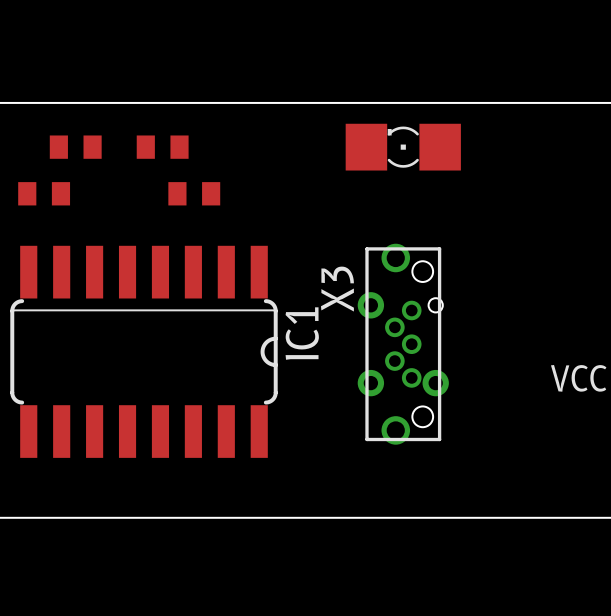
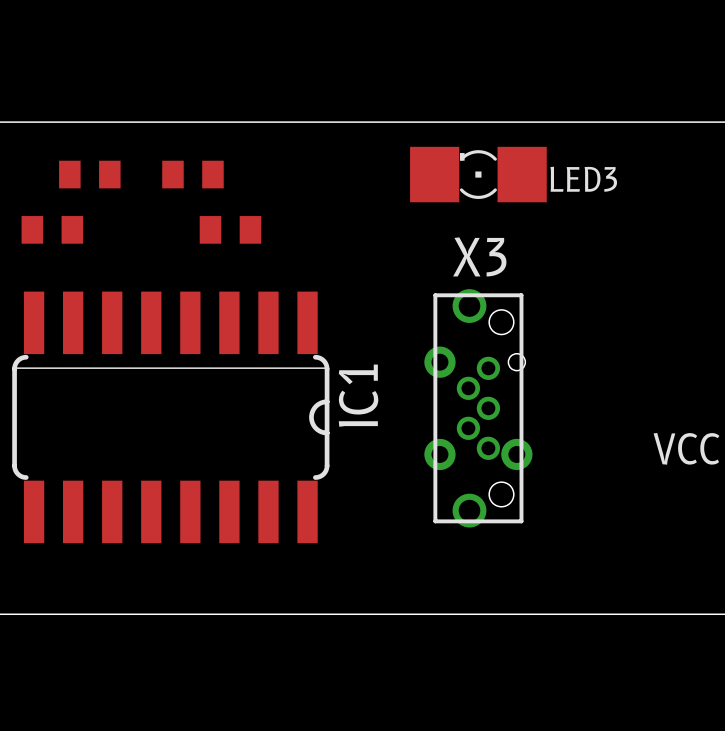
LED3 name: none -> LED3 (583, 179)
X3 name rotation: 0° (337, 289) -> 90° clockwise (479, 256)
X3 name position: X3 (337, 289) -> X3 (479, 256)

